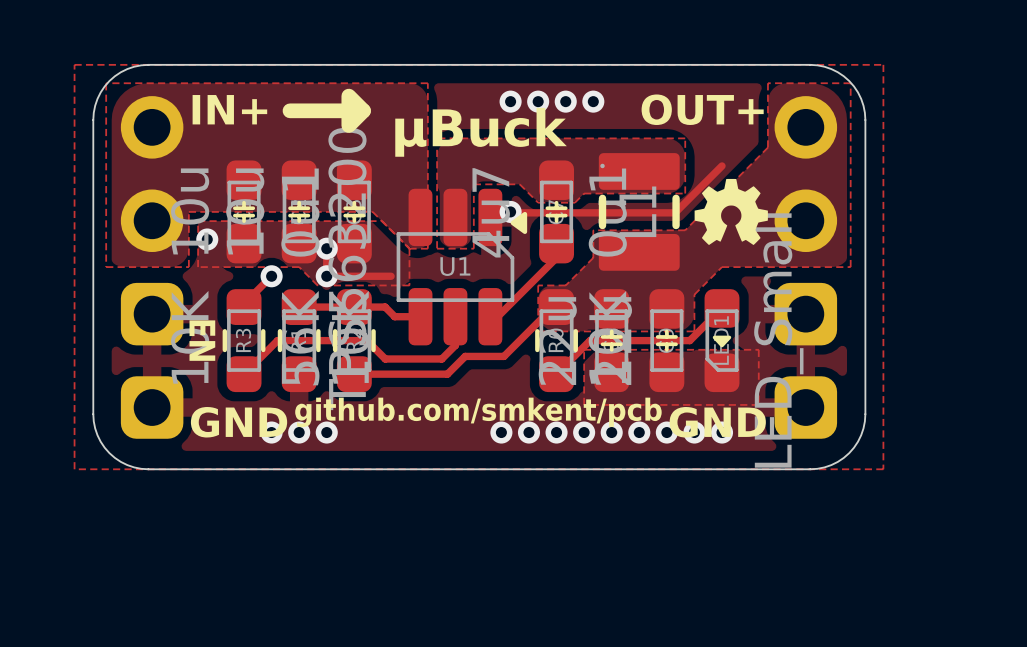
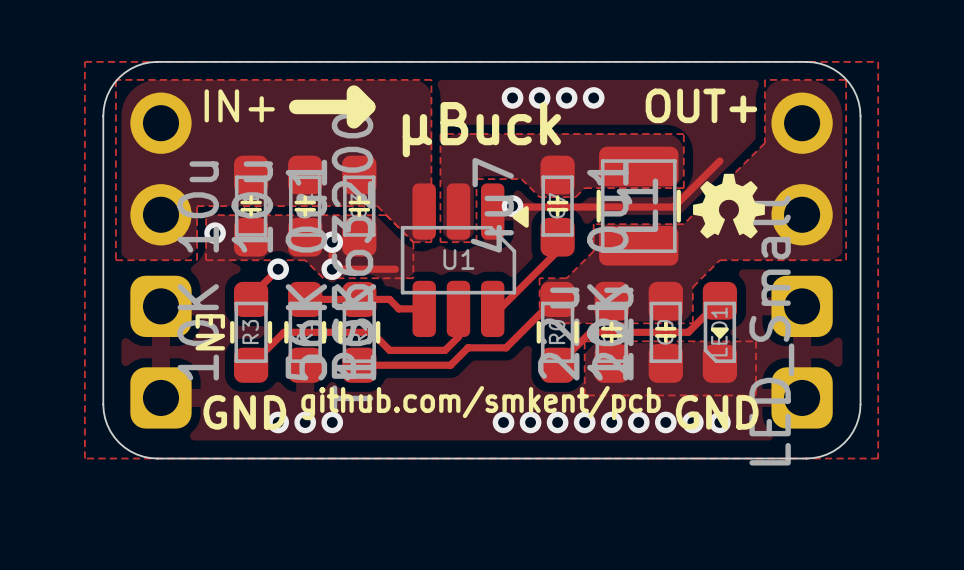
L1 footprint: [598, 153, 680, 271] -> [596, 146, 681, 266]

